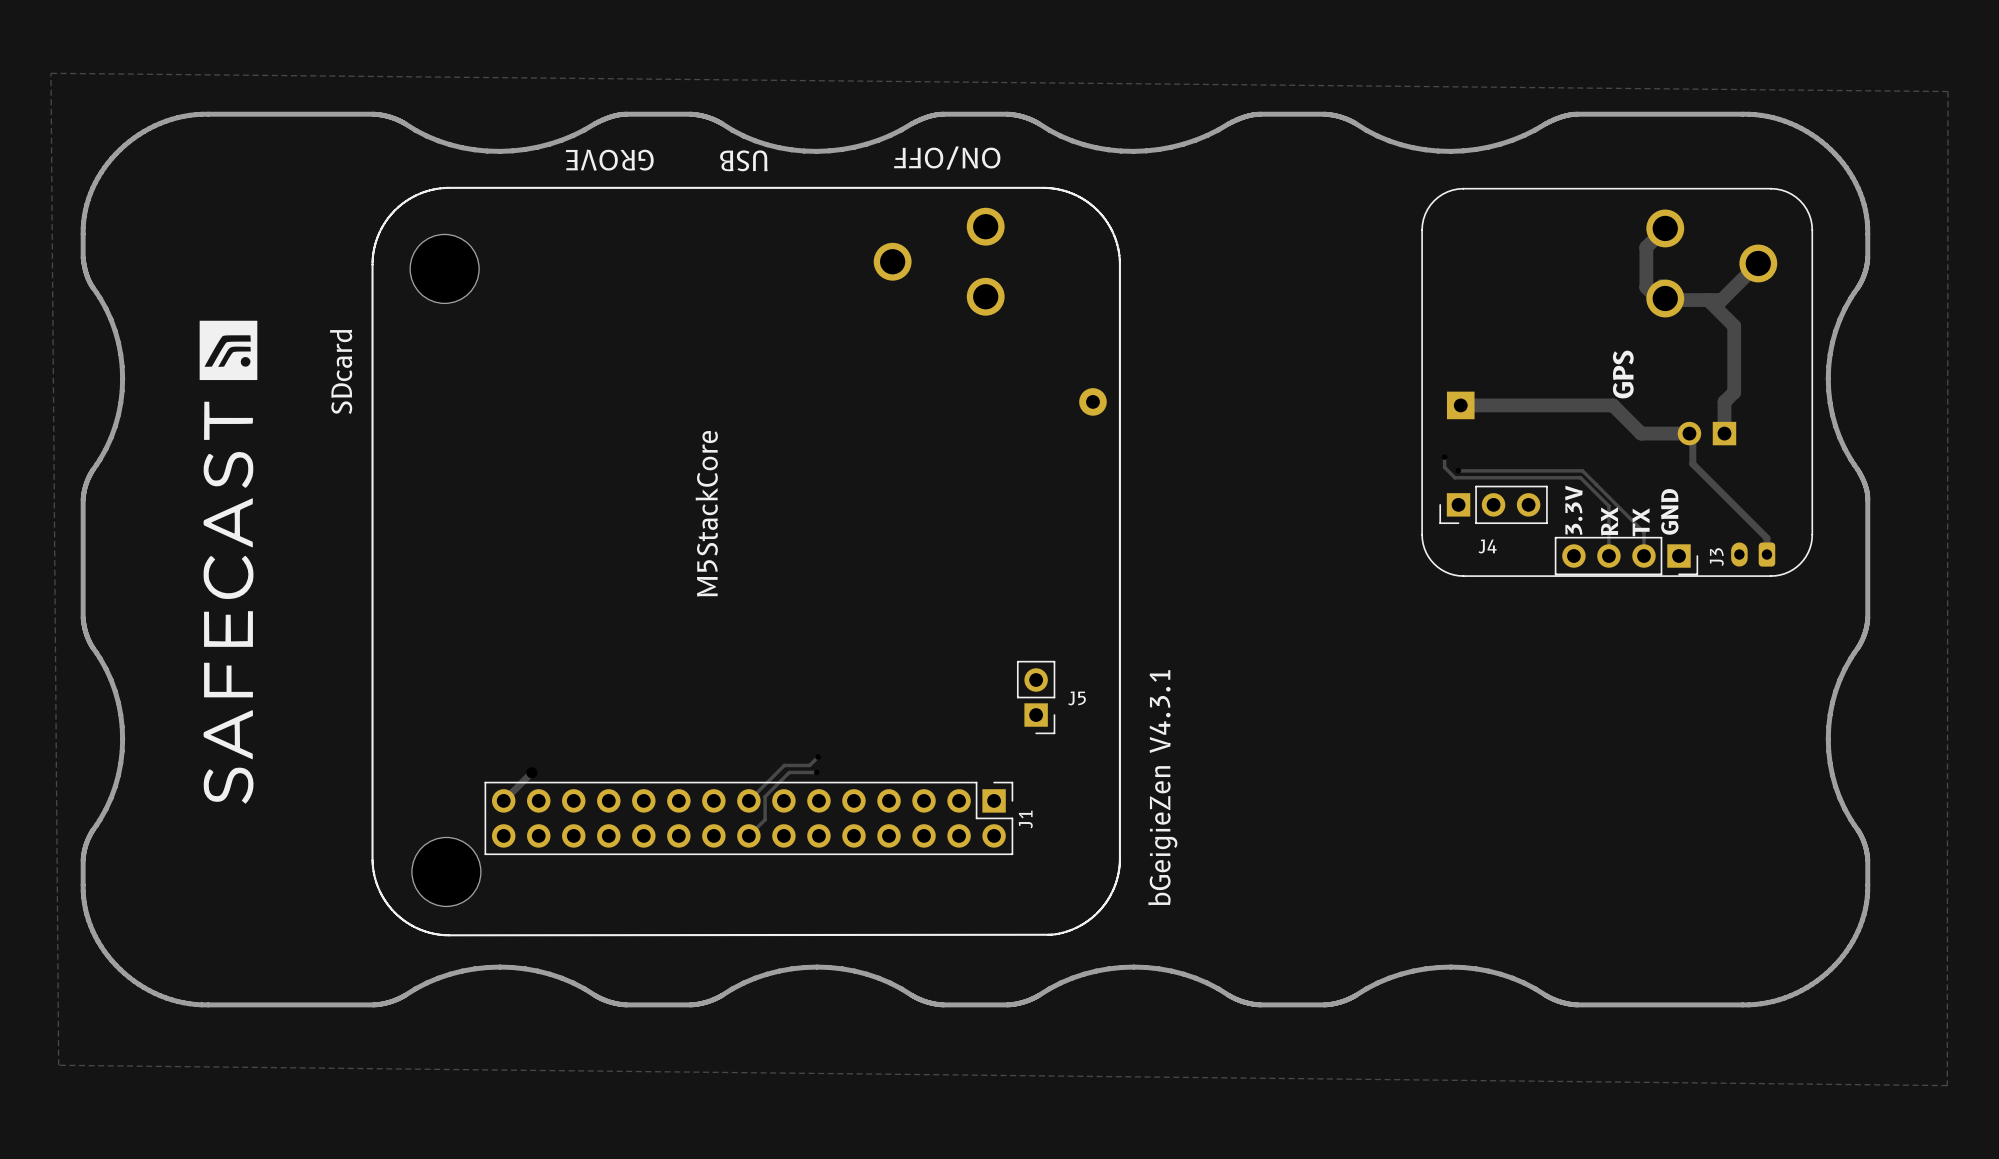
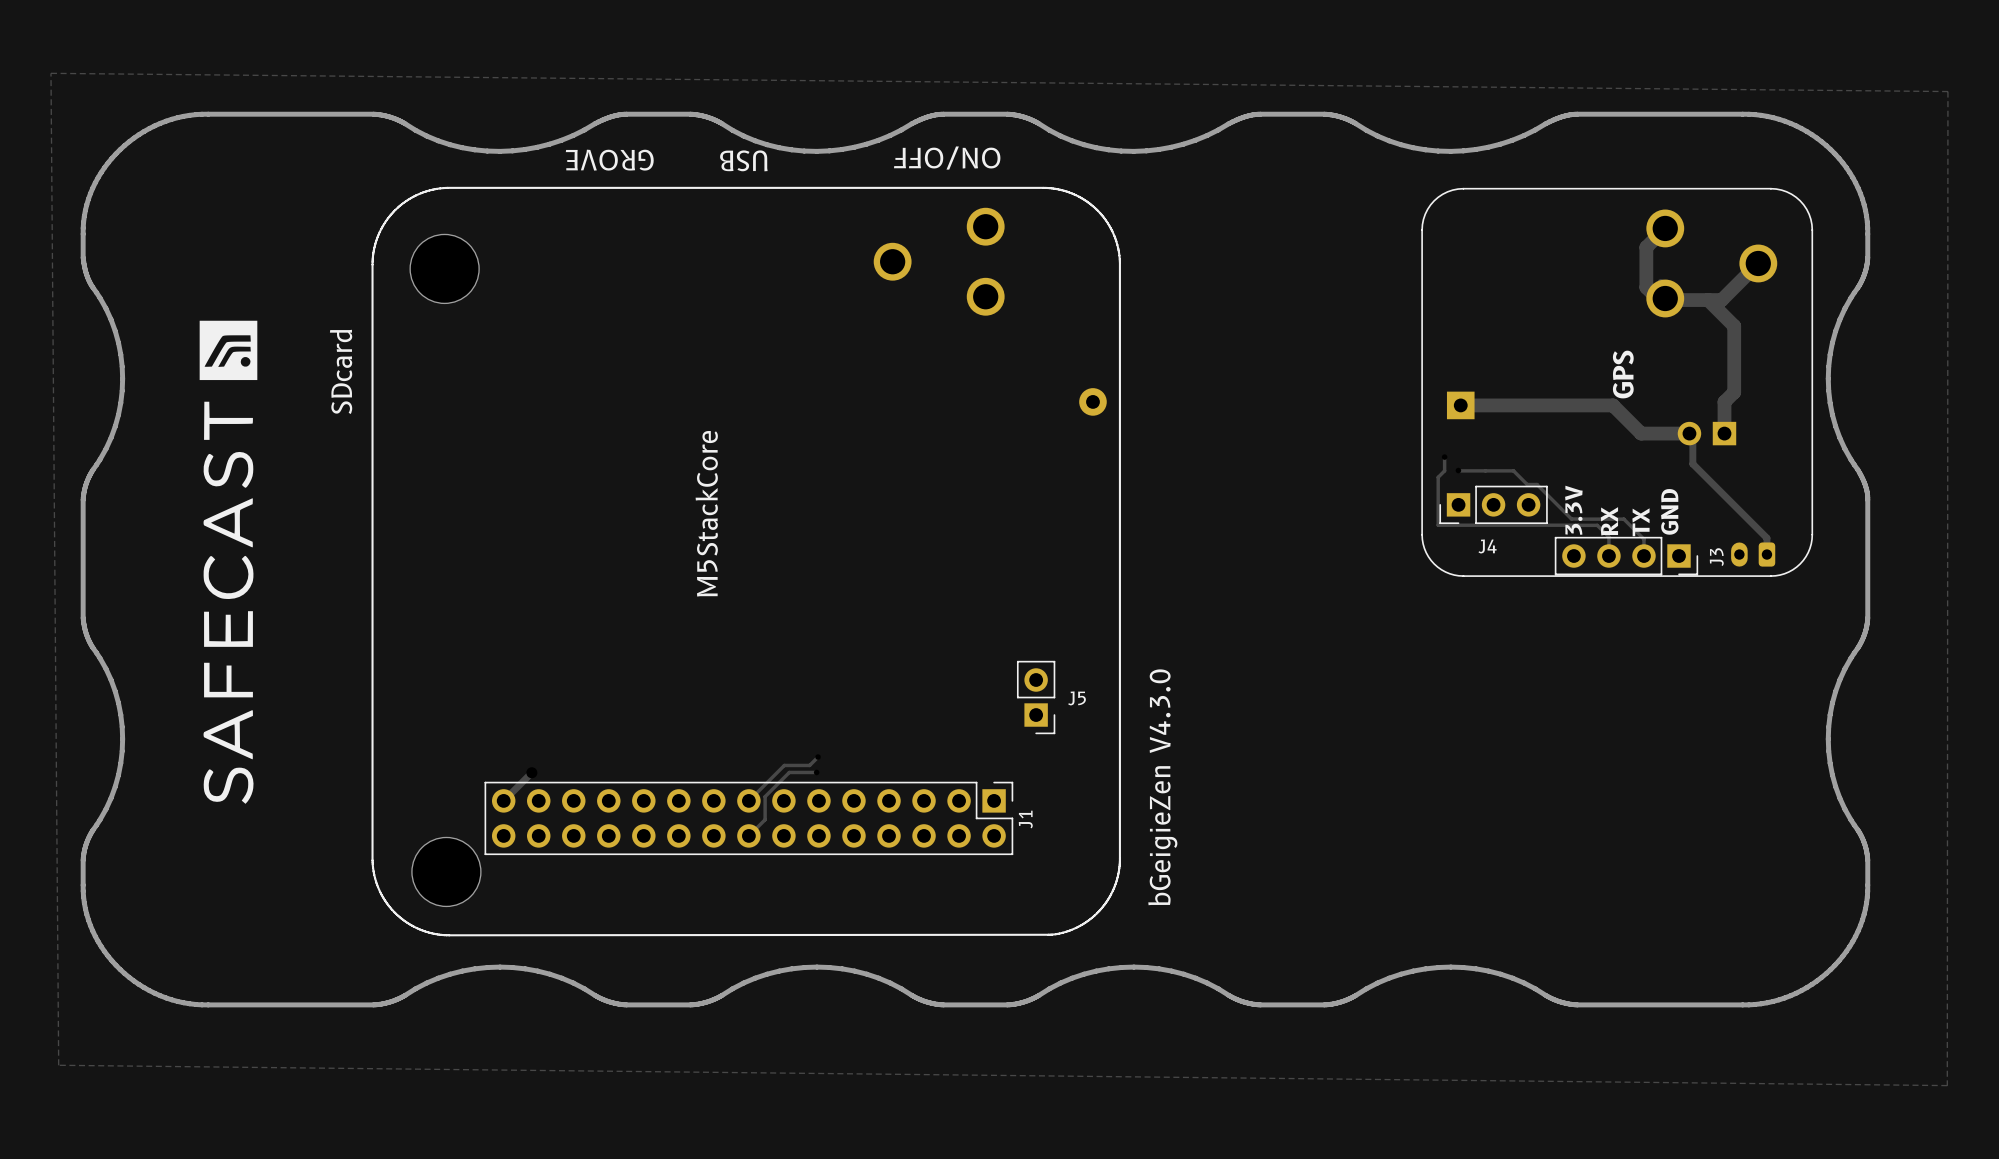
track: (1444, 467) (1454, 477) (1580, 477) (1608, 506) (1608, 537) -> (1444, 467) (1444, 470) (1438, 477) (1438, 525) (1578, 525)
track: (1513, 470) (1582, 470) (1596, 484) -> (1513, 470) (1527, 484) (1537, 484) (1571, 519) (1580, 519)
track: (1596, 484) (1643, 532) (1643, 539) -> (1580, 519) (1623, 519) (1643, 539)
track: none -> (1578, 525) (1597, 525) (1608, 537)
text: bGeigieZen V4.3.1 (1162, 787) -> bGeigieZen V4.3.0 (1162, 787)

